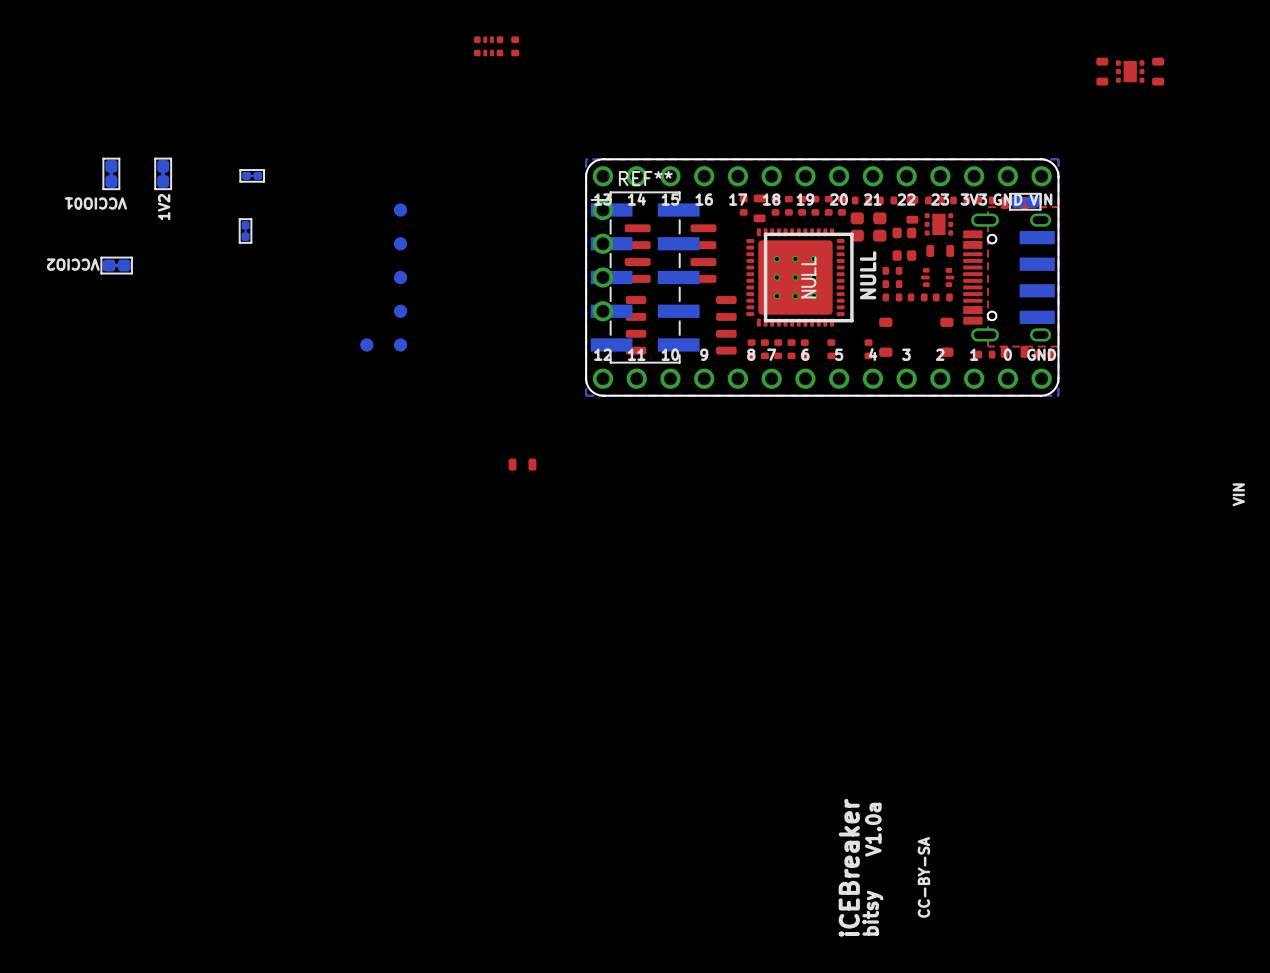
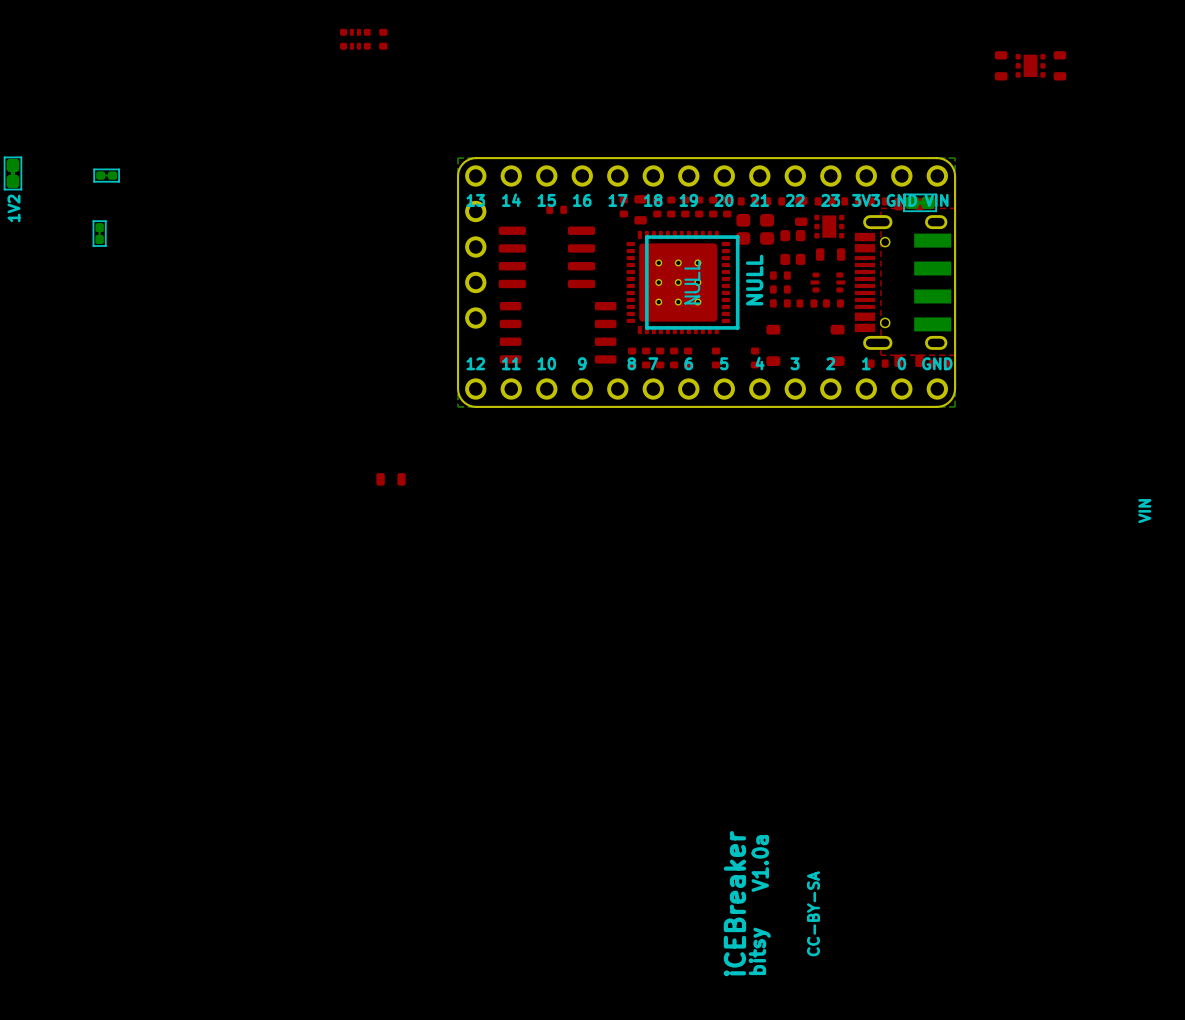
part: (400, 210) -> none
part: (400, 243) -> none
part: (400, 277) -> none
REF**: (645, 277) -> none
part: (400, 311) -> none
part: (366, 344) -> none
part: (400, 344) -> none

